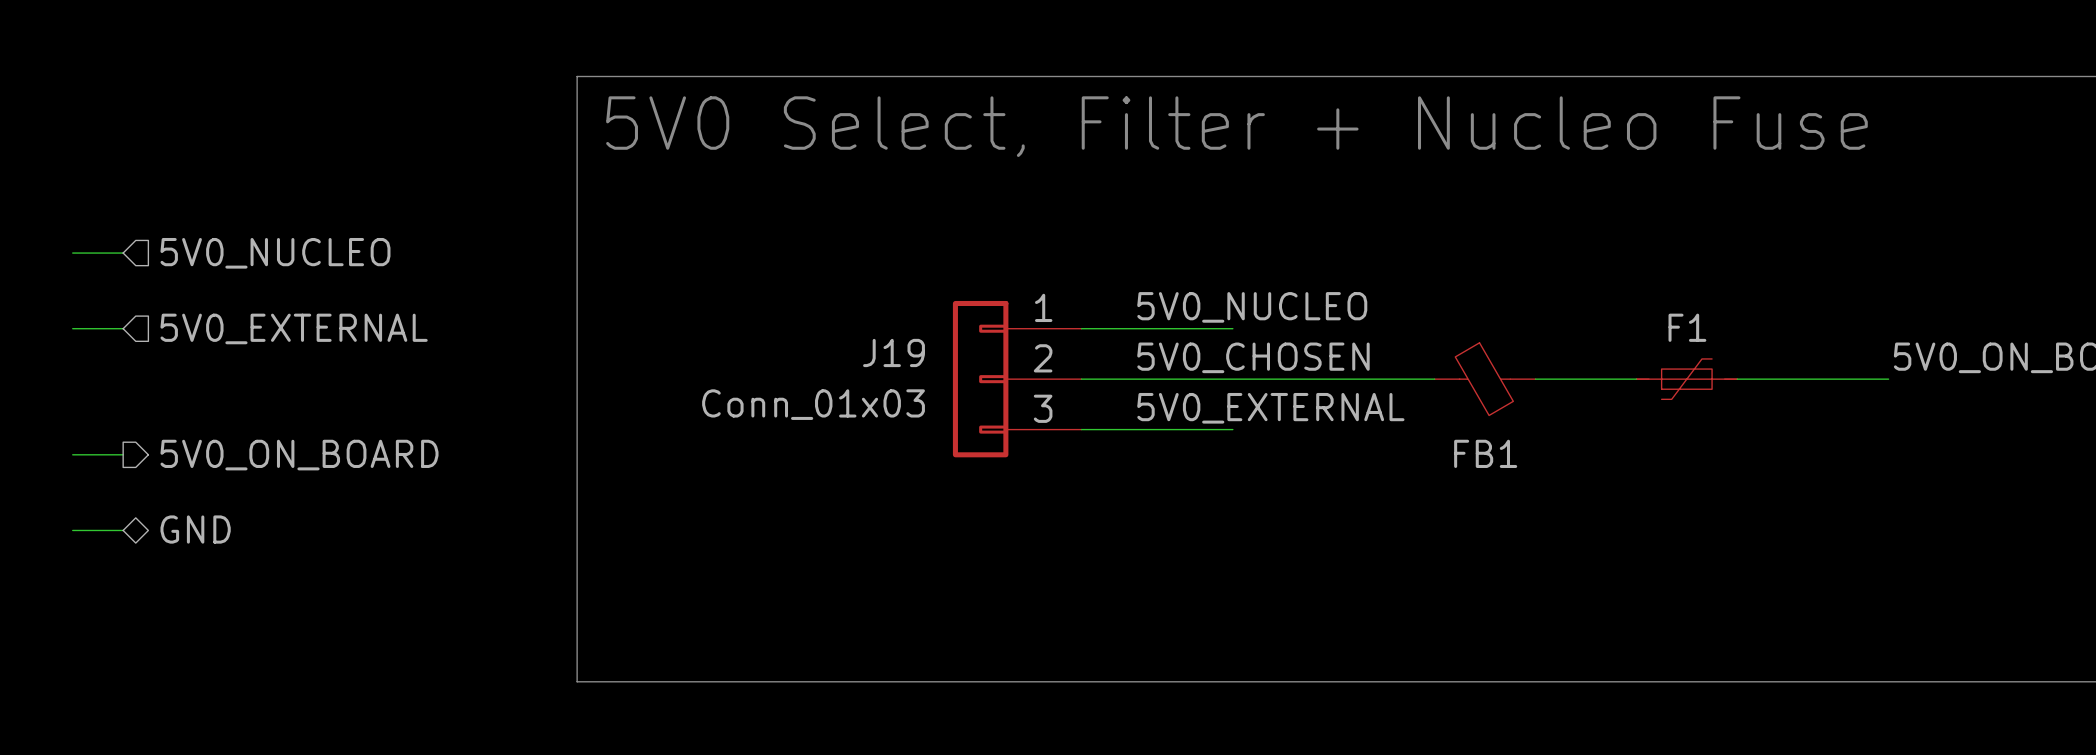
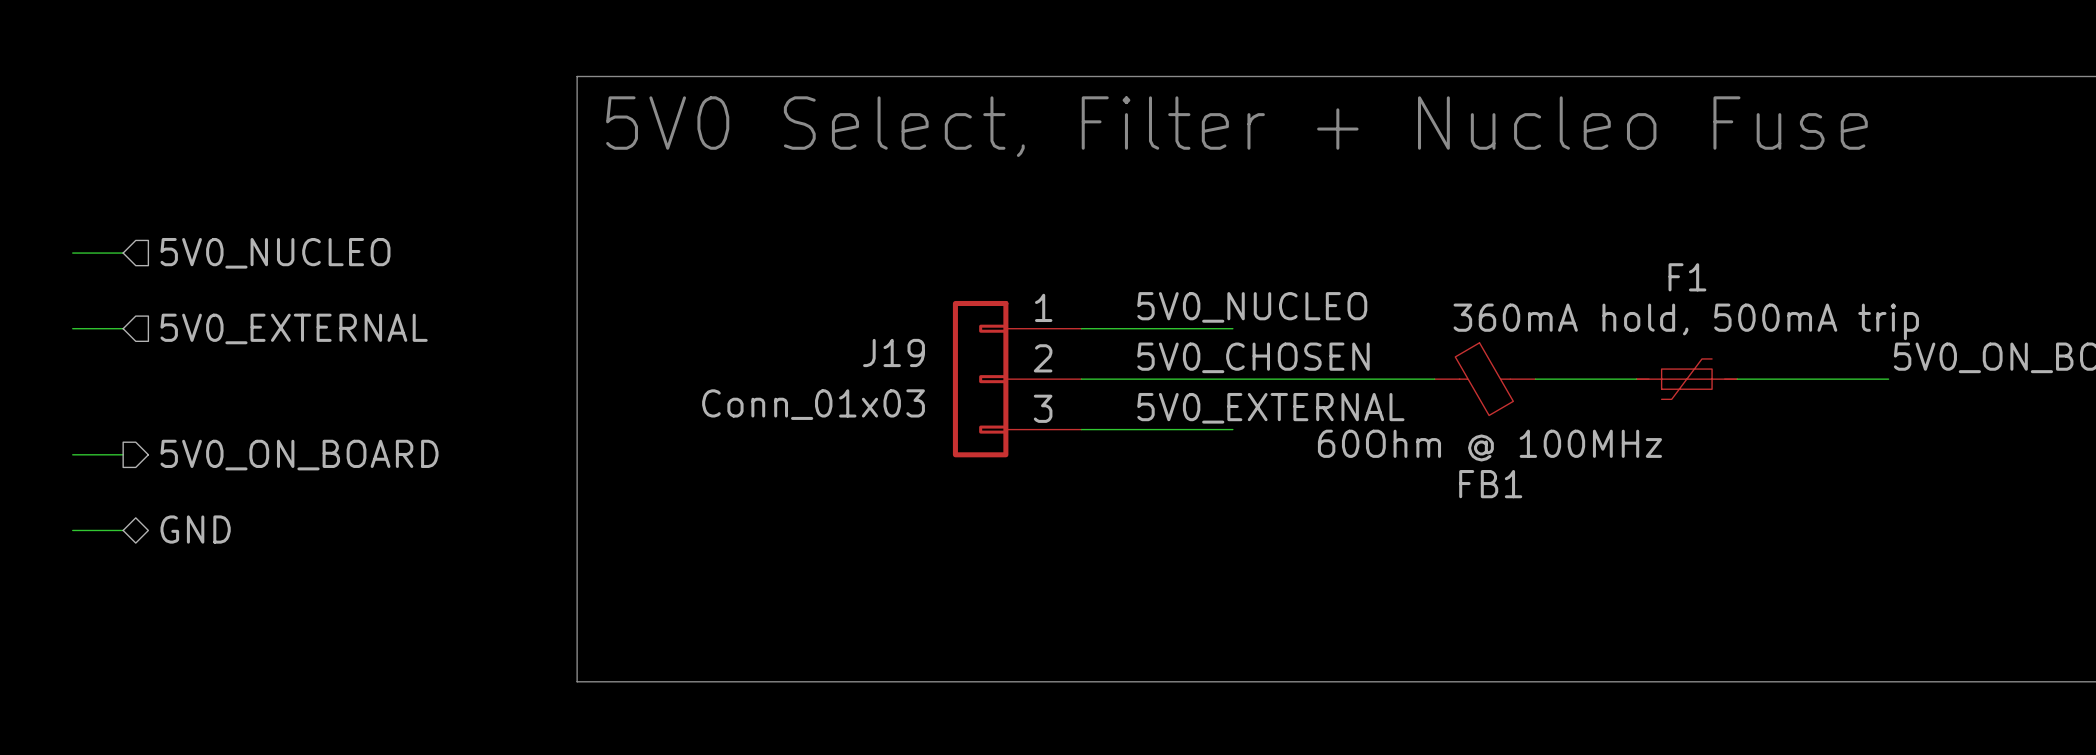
F1 value: none -> 360mA hold, 500mA trip (1686, 321)
F1 name position: F1 (1687, 327) -> F1 (1687, 277)
FB1 value: none -> 60Ohm @ 100MHz (1489, 445)
FB1 name position: FB1 (1485, 453) -> FB1 (1490, 484)

